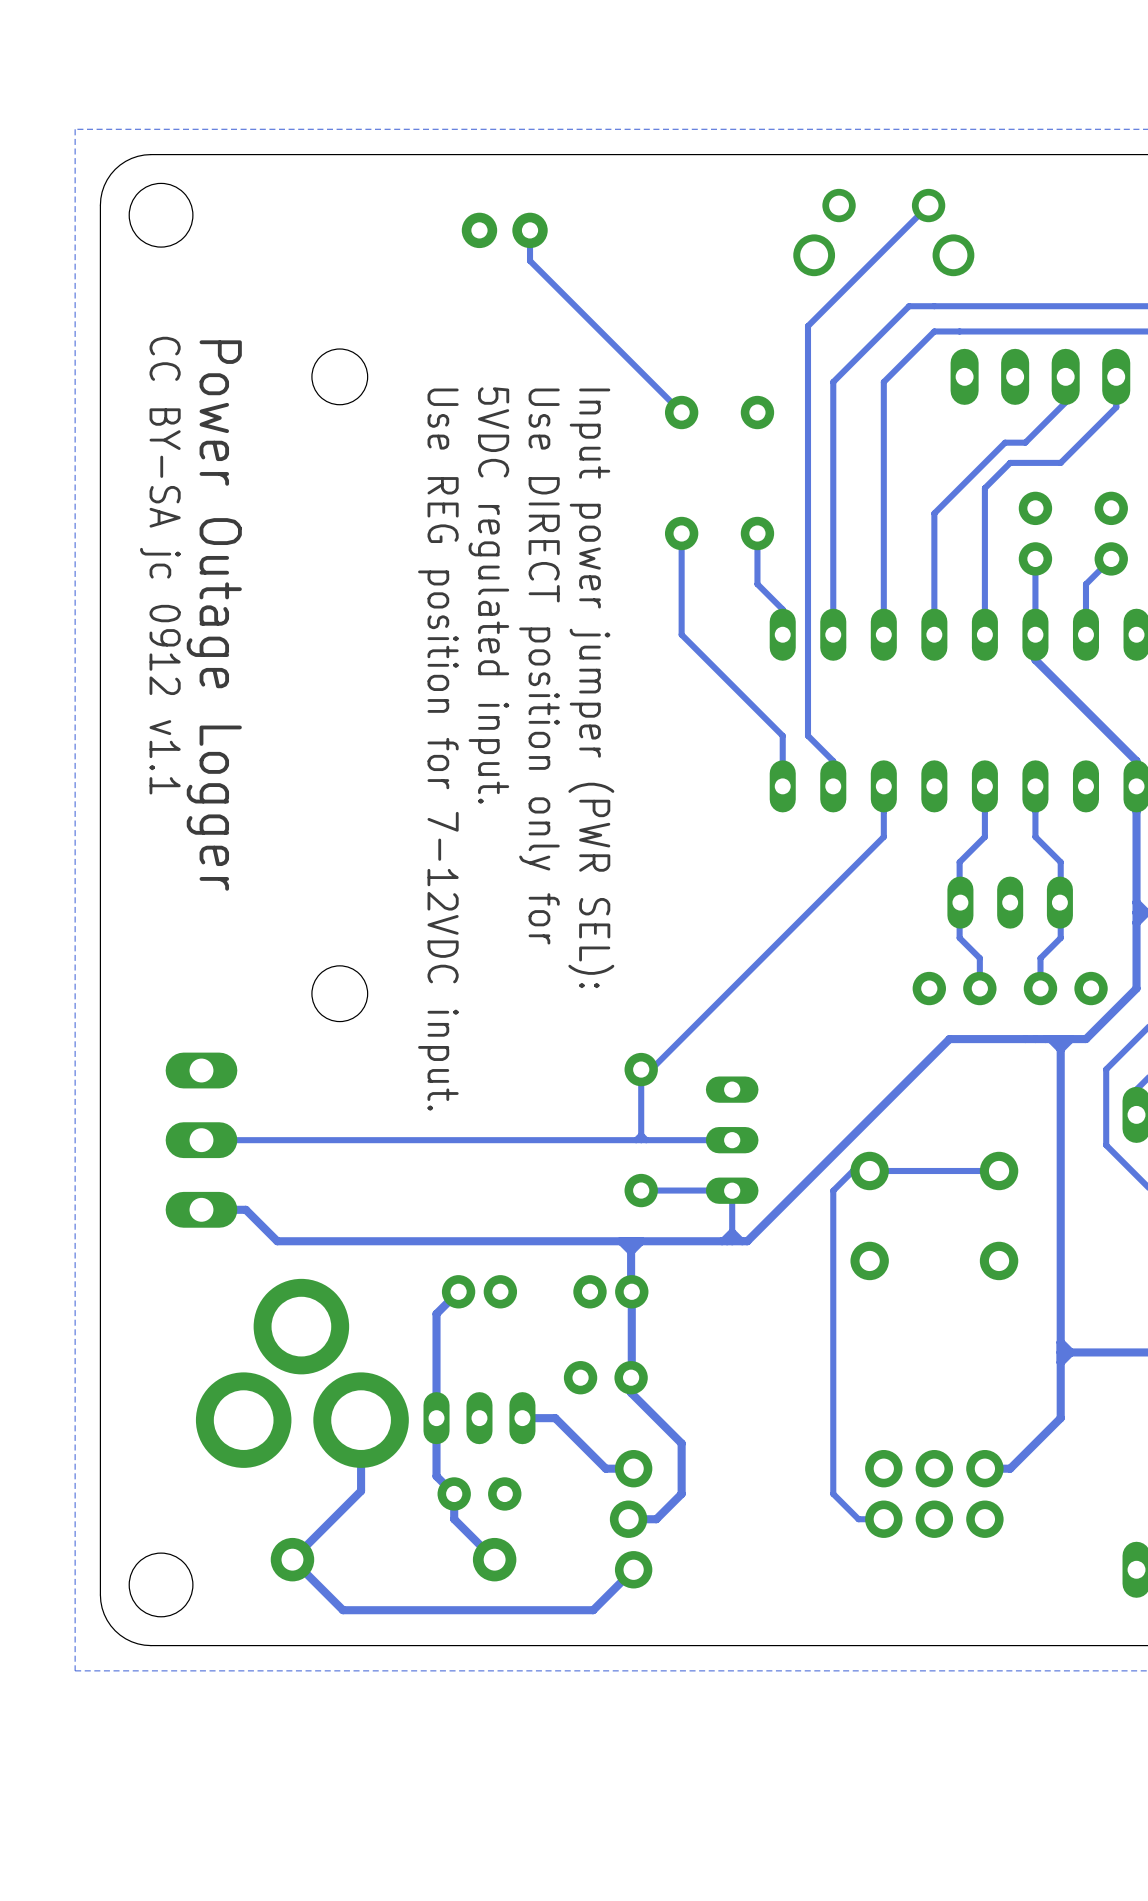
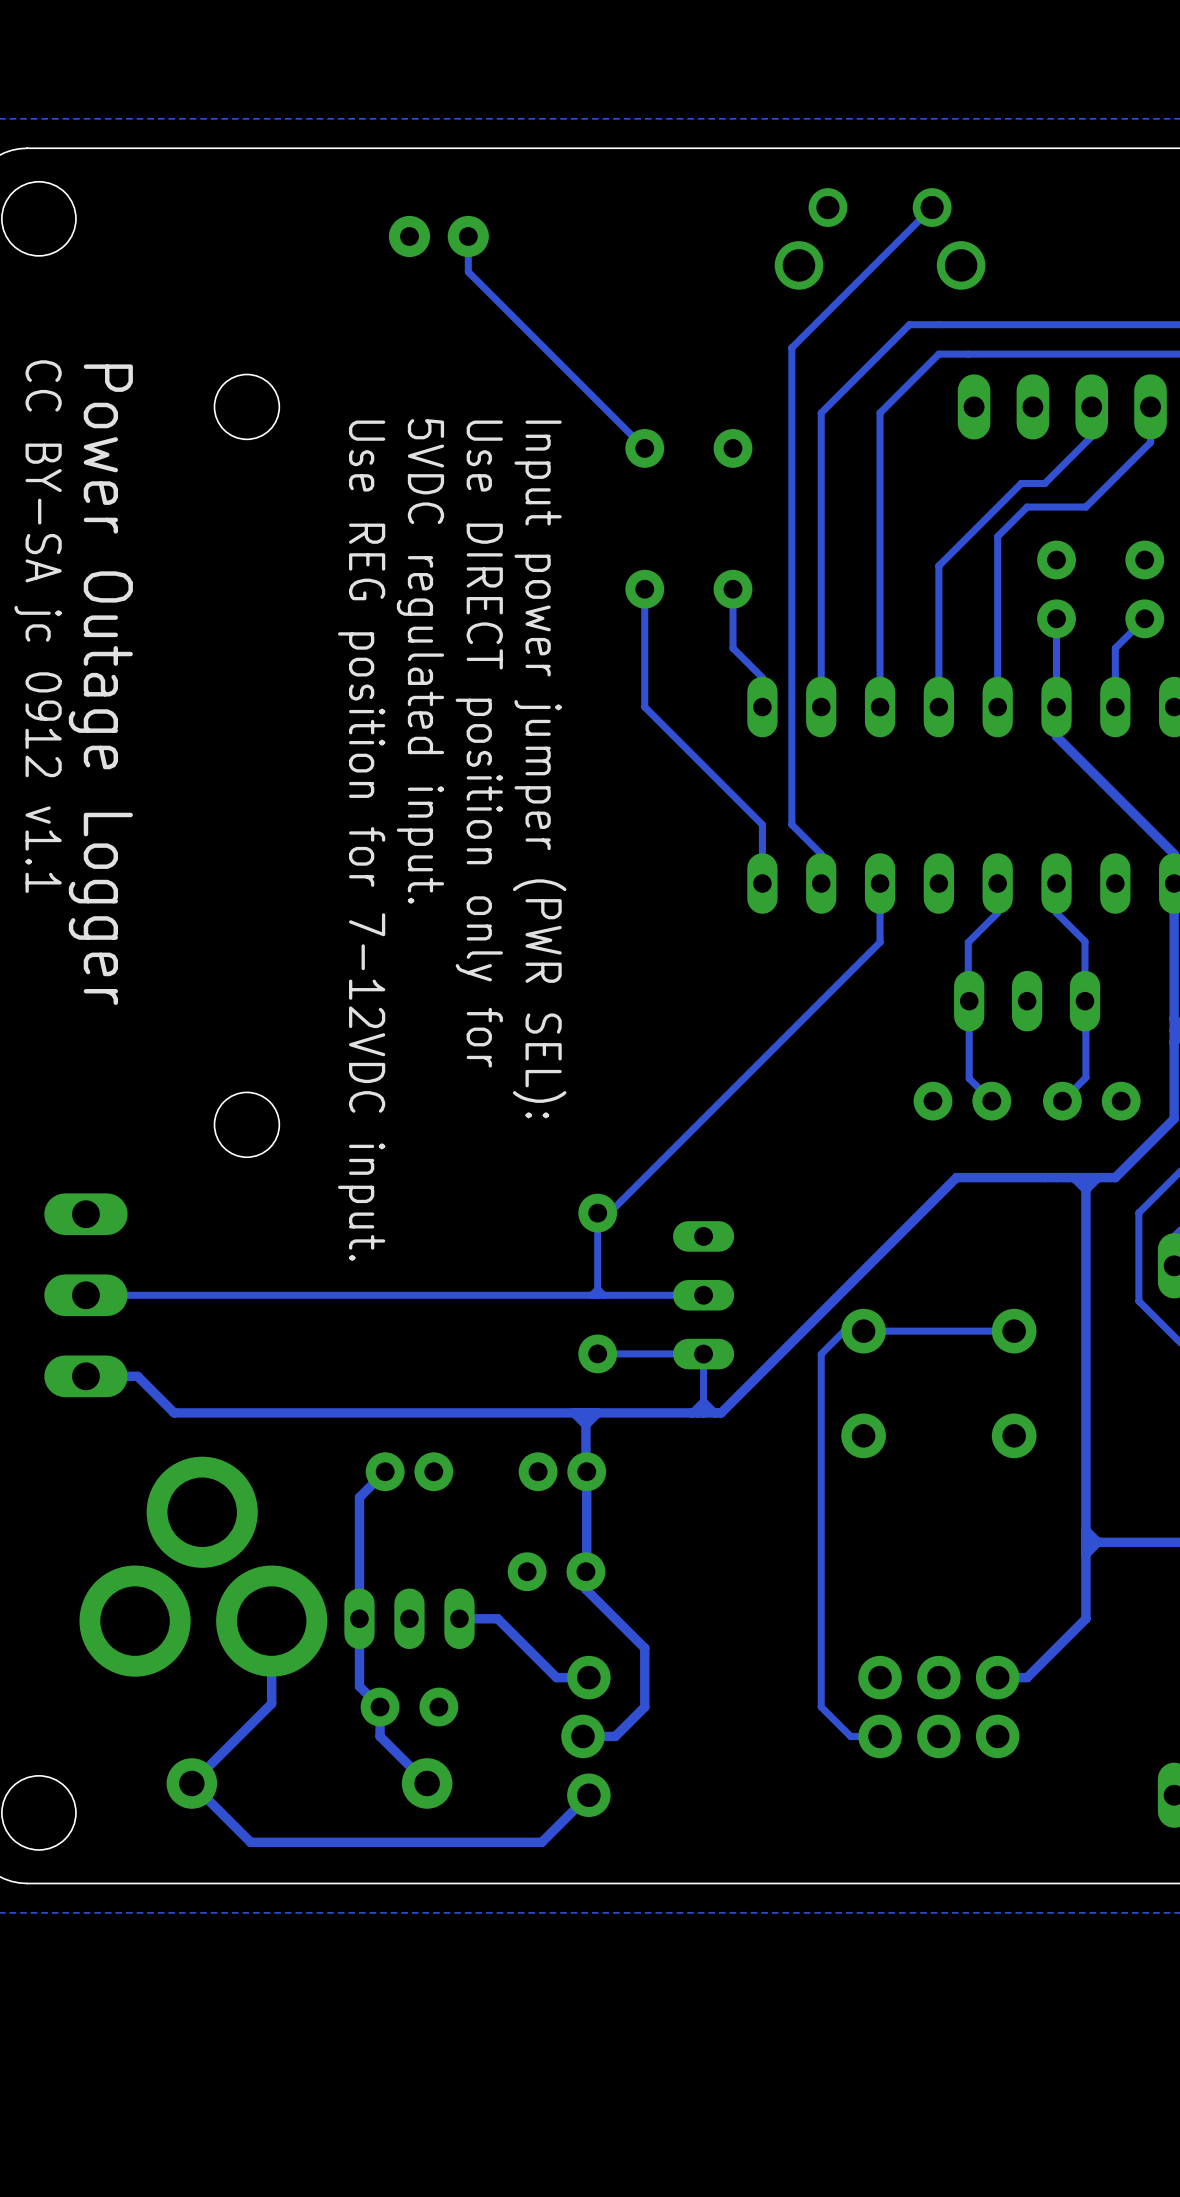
track: (984, 811) (984, 836) (959, 862) -> (997, 912) (968, 942) (968, 971)
track: (1035, 811) (1035, 836) (1060, 862) (1060, 912) -> (1056, 912) (1085, 941) (1085, 1030)
track: (959, 886) (959, 937) (979, 958) (979, 988) -> (968, 1000) (969, 1078) (991, 1101)
part position: (1010, 902) -> (1027, 1001)
track: (1060, 937) (1040, 958) (1040, 988) -> (1085, 1059) (1085, 1077) (1062, 1101)
part position: (954, 988) -> (962, 1101)
part position: (1065, 988) -> (1091, 1101)

